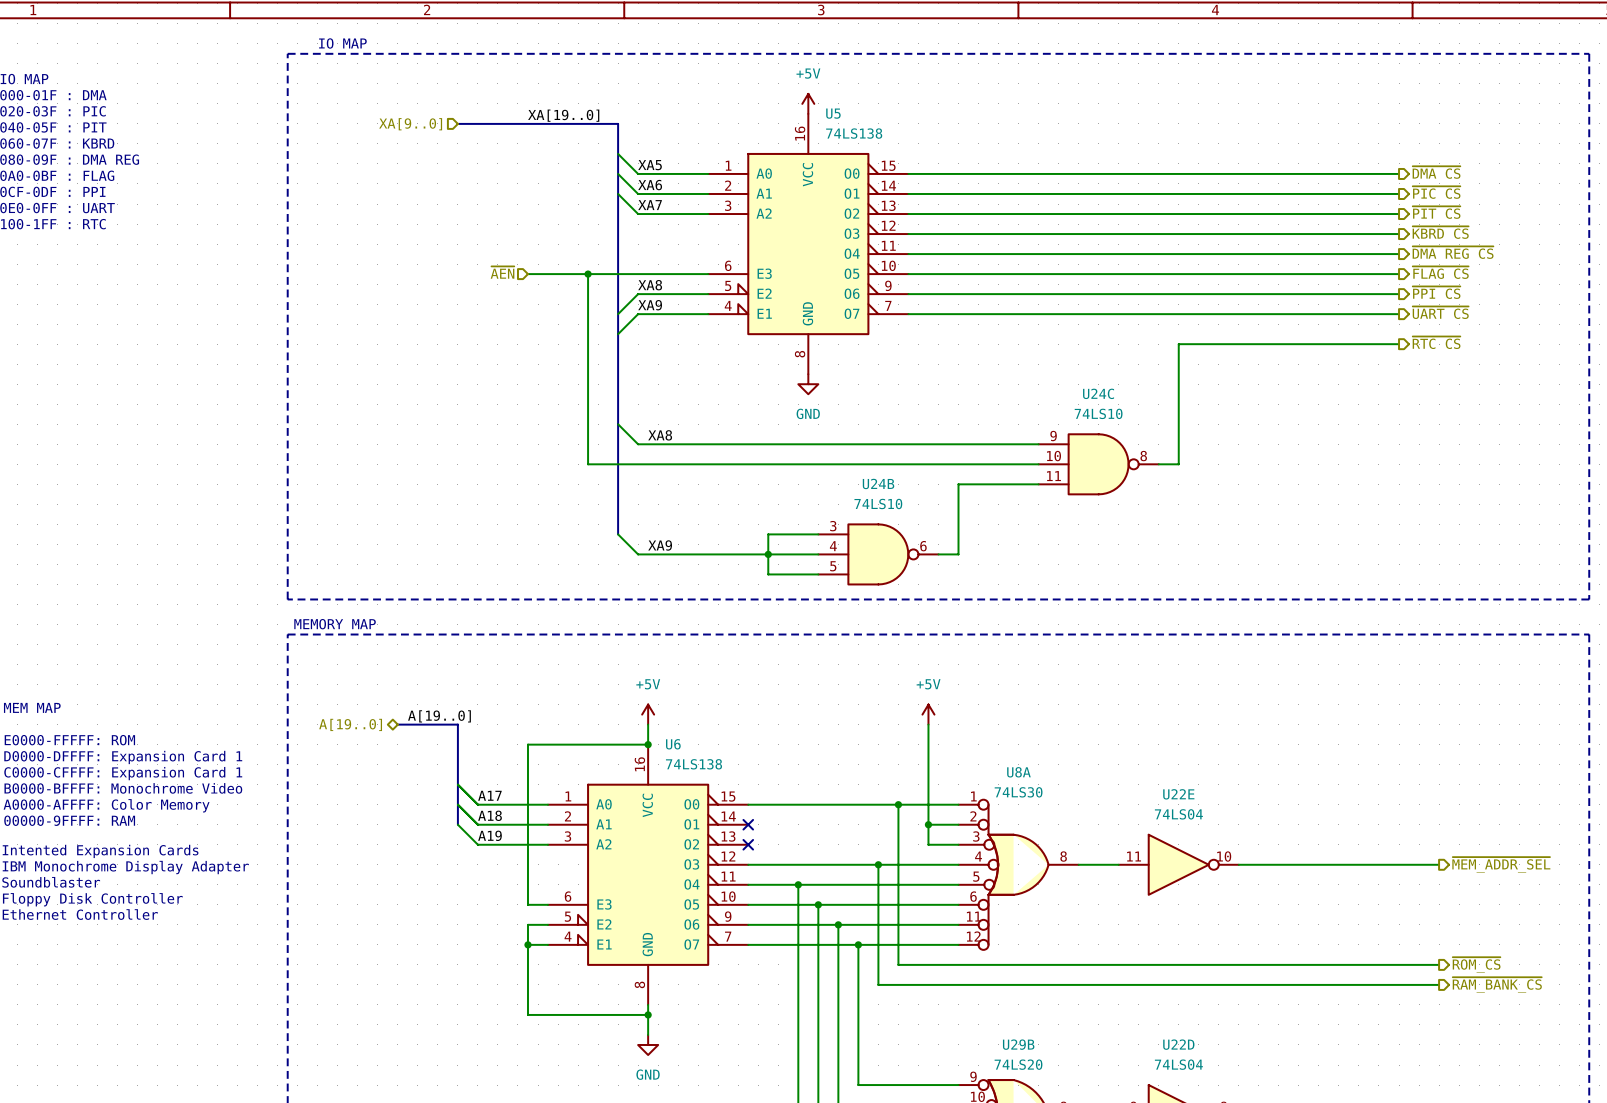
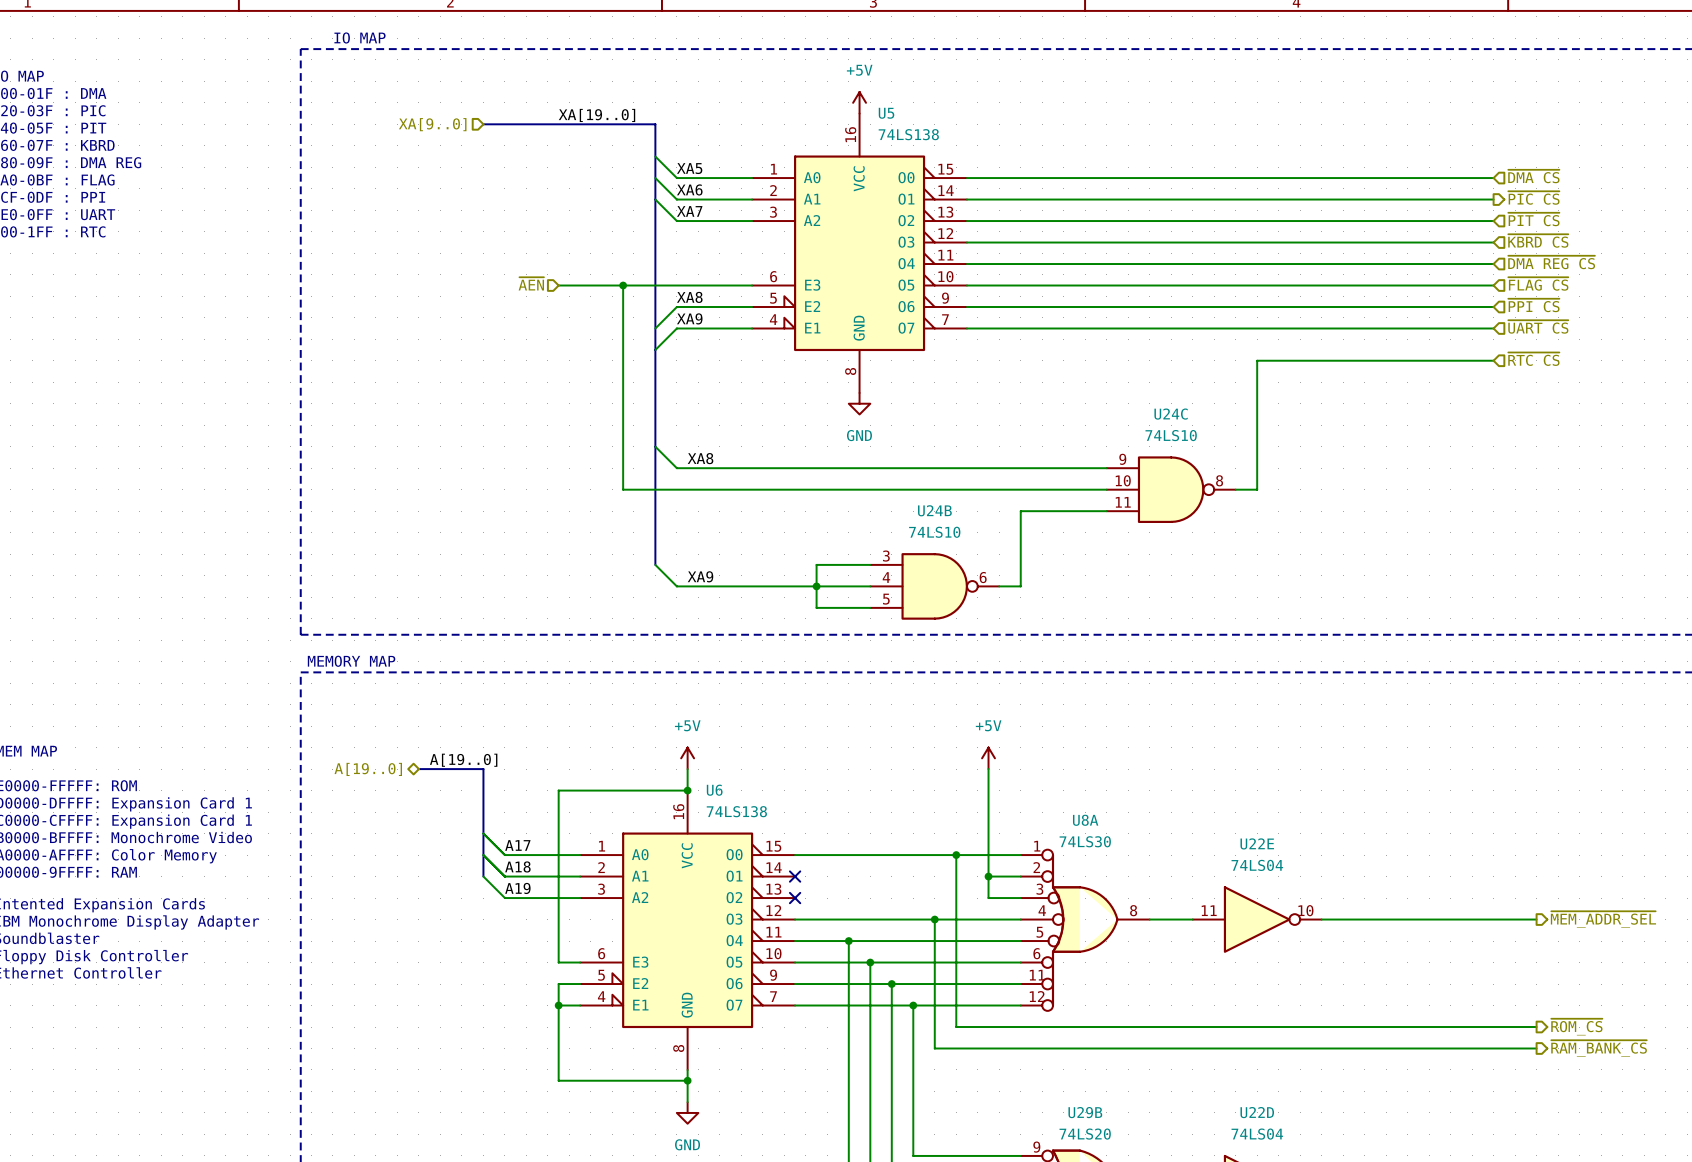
hierarchical label shape: output (1436, 172) -> input (1533, 176)
hierarchical label shape: output (1436, 212) -> input (1533, 219)
hierarchical label shape: output (1440, 232) -> input (1538, 240)
hierarchical label shape: output (1453, 252) -> input (1551, 262)
hierarchical label shape: output (1440, 272) -> input (1538, 283)
hierarchical label shape: output (1436, 292) -> input (1533, 305)
hierarchical label shape: output (1440, 312) -> input (1538, 326)
hierarchical label shape: output (1436, 342) -> input (1533, 359)

